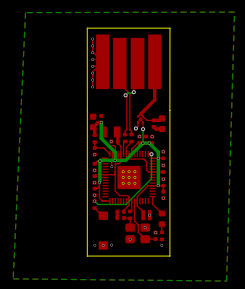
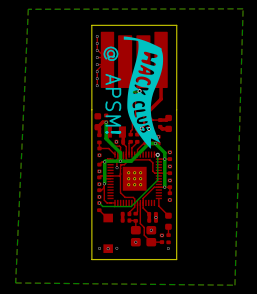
drawing: none -> [123, 36, 164, 149]
text: none -> @ APSM! (112, 90)

